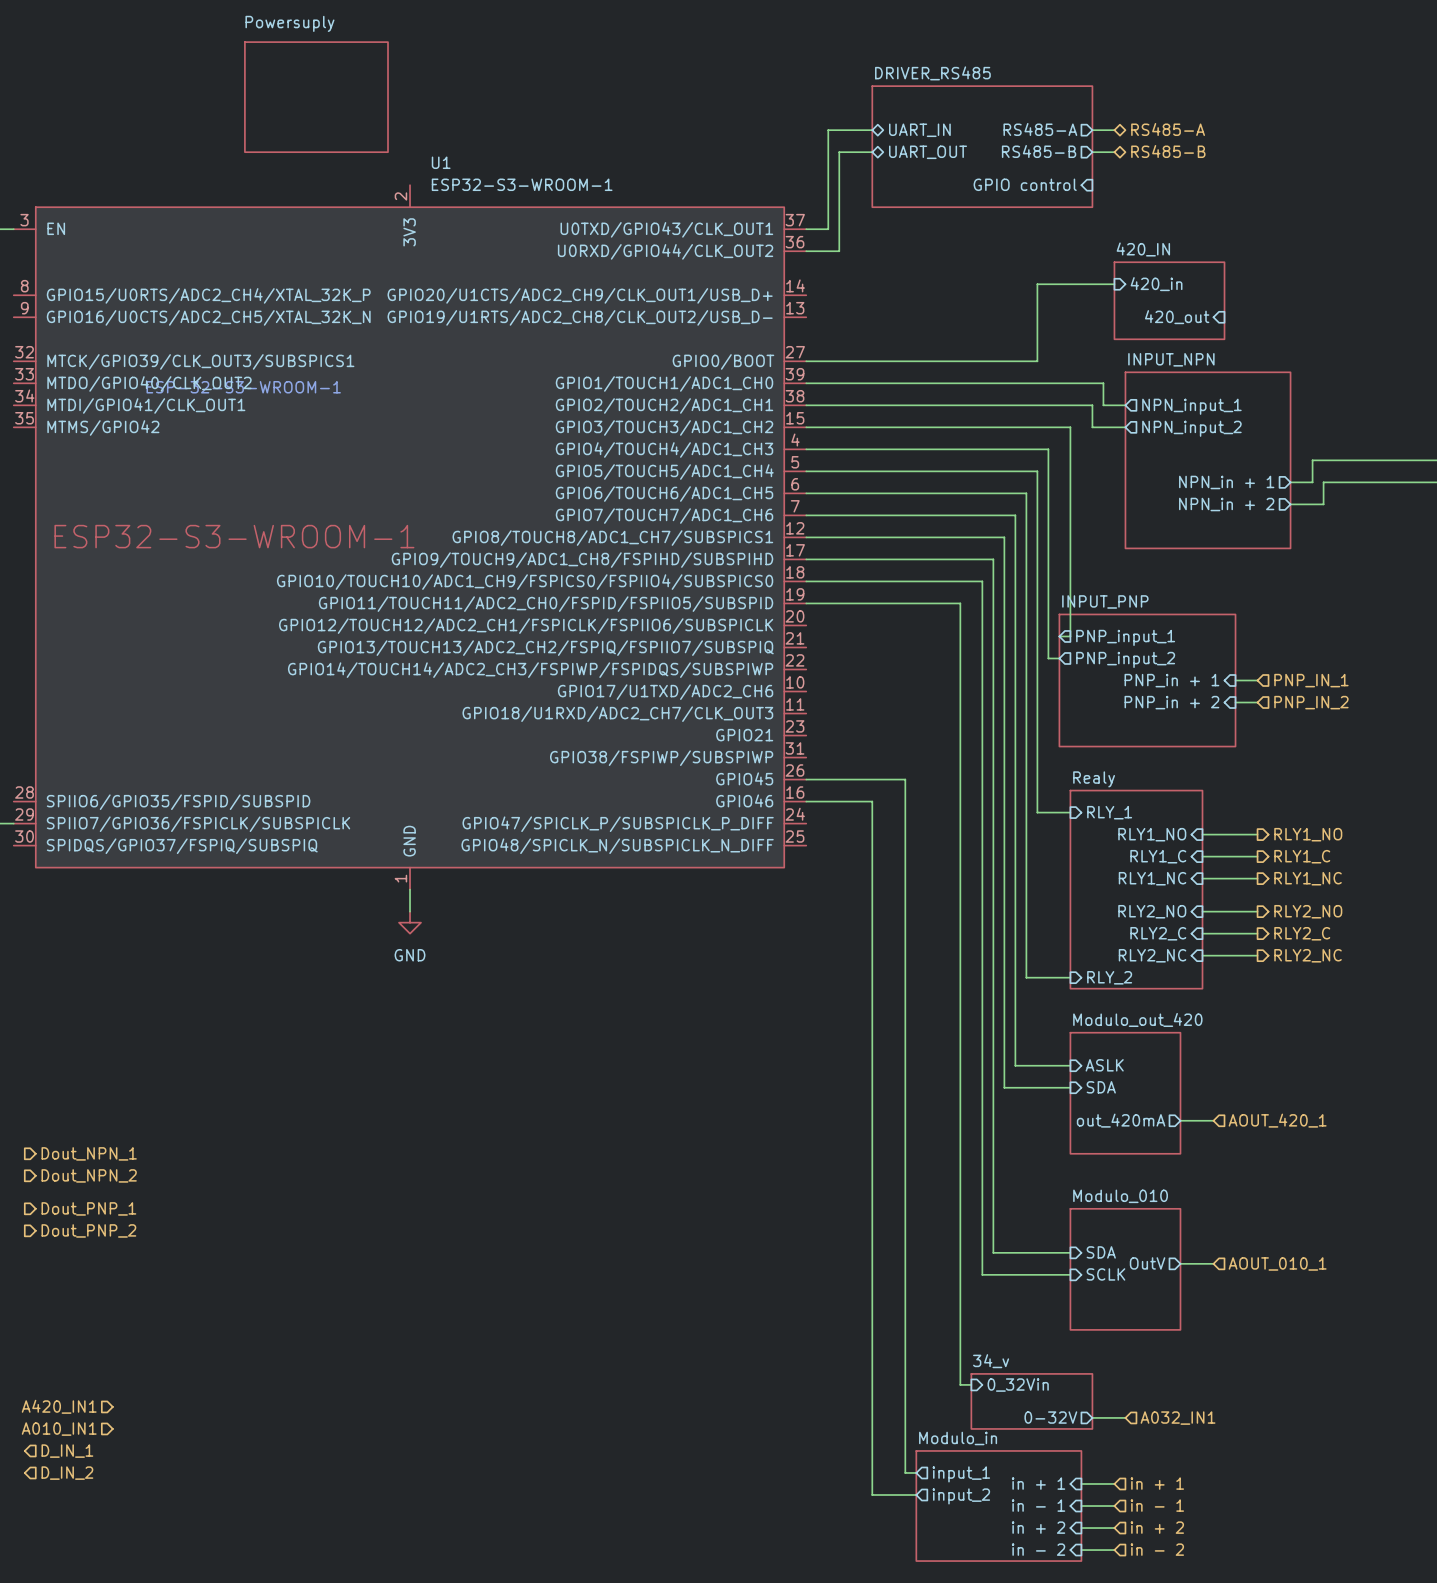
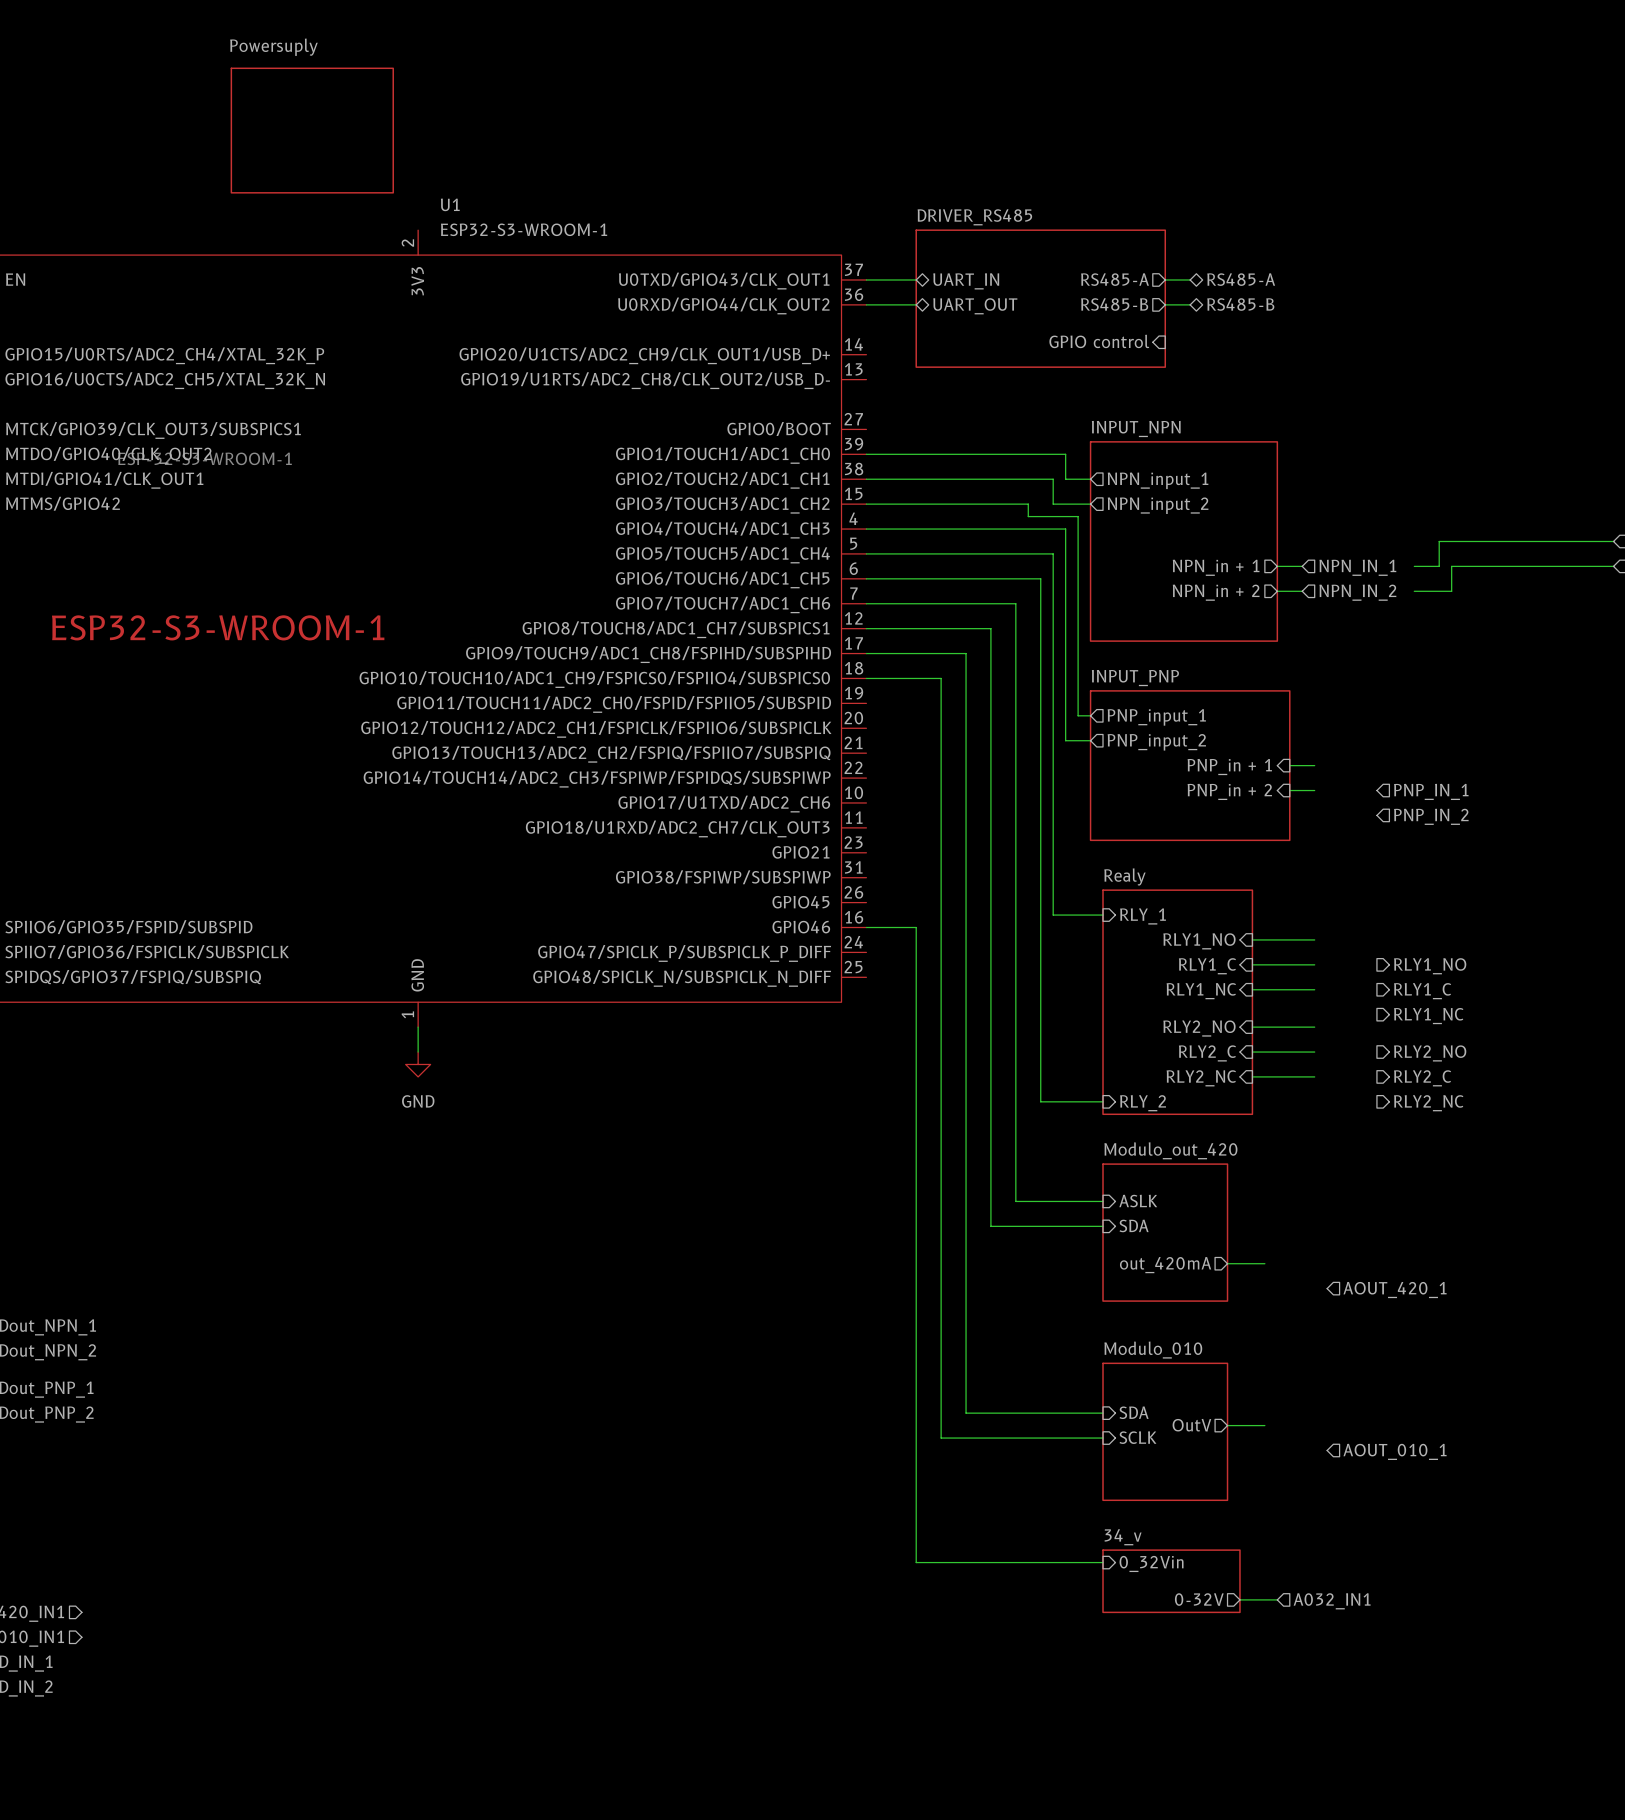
sheet pin position: RS485-A (1040, 129) -> RS485-A (1115, 279)
hierarchical label position: RS485-A (1168, 129) -> RS485-A (1241, 279)
wire: (872, 130) (828, 130) (828, 229) -> (916, 279) (891, 279)
sheet pin position: UART_IN (919, 130) -> UART_IN (966, 281)
wire: (1092, 130) (1114, 130) -> (1165, 279) (1190, 279)
sheet DRIVER_RS485 position: (982, 146) -> (1040, 298)
sheet pin position: RS485-B (1039, 151) -> RS485-B (1114, 304)
hierarchical label position: RS485-B (1168, 151) -> RS485-B (1240, 304)
wire: (872, 152) (839, 152) (839, 251) -> (916, 304) (903, 304)
sheet pin position: UART_OUT (928, 152) -> UART_OUT (975, 306)
wire: (1092, 152) (1114, 152) -> (1165, 304) (1190, 304)
sheet pin position: GPIO control (1025, 184) -> GPIO control (1099, 341)
wire: (1114, 284) (1037, 284) (1037, 361) (806, 361) -> none
sheet pin: 420_in (1156, 284) -> none
sheet 420_IN: (1169, 300) -> none
sheet pin: 420_out (1177, 317) -> none
wire: (982, 383) (1103, 383) (1103, 405) (1125, 405) -> none
wire: (971, 405) (982, 405) -> (1065, 454) (1065, 479)
wire: (1004, 405) (1092, 405) (1092, 427) (1125, 427) -> none
sheet pin position: NPN_input_1 (1191, 406) -> NPN_input_1 (1158, 480)
wire: (949, 427) (971, 427) -> (1053, 479) (1053, 504)
wire: (1004, 427) (1070, 427) (1070, 636) (1059, 636) -> none
sheet pin position: NPN_input_2 (1191, 428) -> NPN_input_2 (1158, 505)
wire: (982, 449) (1048, 449) (1048, 658) (1059, 658) -> (1065, 529) (1065, 678)
sheet INPUT_NPN position: (1208, 460) -> (1183, 541)
wire: (971, 471) (1037, 471) (1037, 812) (1070, 812) -> (1053, 553) (1053, 915) (1103, 915)
wire: none -> (1277, 566) (1302, 566)
sheet pin position: NPN_in + 1 (1226, 482) -> NPN_in + 1 (1216, 567)
hierarchical label: none -> NPN_IN_1 (1357, 567)
wire: (960, 493) (1026, 493) (1026, 977) (1070, 977) -> none
wire: none -> (1277, 591) (1302, 591)
sheet pin position: NPN_in + 2 (1226, 504) -> NPN_in + 2 (1216, 592)
hierarchical label: none -> NPN_IN_2 (1357, 592)
wire: (938, 515) (1015, 515) (1015, 1065) (1070, 1065) -> (1015, 603) (1015, 1201) (1103, 1201)
wire: (916, 537) (1004, 537) (1004, 1087) (1070, 1087) -> (990, 628) (990, 1226) (1103, 1226)
wire: (894, 559) (993, 559) -> (1028, 504) (1028, 516) (1078, 516) (1078, 653)
wire: none -> (966, 653) (966, 1413) (1103, 1413)
wire: (872, 581) (982, 581) -> none
wire: (806, 603) (960, 603) -> (1040, 578) (1040, 703)
wire: (993, 614) (993, 1252) -> (1078, 715) (1090, 715)
wire: (982, 636) (982, 1274) (1070, 1274) -> (1065, 740) (1090, 740)
sheet pin position: PNP_input_1 (1125, 637) -> PNP_input_1 (1156, 717)
sheet pin position: PNP_input_2 (1125, 659) -> PNP_input_2 (1156, 742)
sheet INPUT_PNP position: (1147, 680) -> (1190, 765)
sheet pin position: PNP_in + 1 (1171, 680) -> PNP_in + 1 (1229, 767)
wire: (1235, 680) (1257, 680) -> (1289, 765) (1314, 765)
sheet pin position: PNP_in + 2 (1171, 702) -> PNP_in + 2 (1229, 791)
wire: (1235, 702) (1257, 702) -> (1289, 790) (1314, 790)
wire: (806, 779) (905, 779) (905, 1472) (916, 1472) -> none
wire: (850, 801) (872, 801) -> (941, 678) (941, 927)
wire: none -> (916, 927) (916, 1562) (1103, 1562)
sheet pin position: RLY_1 (1109, 812) -> RLY_1 (1143, 916)
sheet pin position: RLY1_NO (1152, 834) -> RLY1_NO (1199, 941)
wire: (1202, 834) (1257, 834) -> (1314, 964) (1252, 964)
sheet pin position: RLY1_C (1158, 856) -> RLY1_C (1207, 966)
wire: (1202, 856) (1257, 856) -> (1314, 989) (1252, 989)
sheet pin position: RLY1_NC (1152, 878) -> RLY1_NC (1201, 991)
wire: (1202, 878) (1257, 878) -> (1252, 939) (1314, 939)
sheet Realy position: (1136, 889) -> (1177, 1002)
sheet pin position: RLY2_NO (1152, 911) -> RLY2_NO (1199, 1028)
wire: (1202, 911) (1257, 911) -> (1314, 1052) (1252, 1052)
sheet pin position: RLY2_C (1158, 933) -> RLY2_C (1207, 1053)
wire: (1202, 933) (1257, 933) -> (1314, 1076) (1252, 1076)
wire: (960, 955) (960, 1384) (971, 1384) -> (1040, 1101) (1103, 1101)
sheet pin position: RLY2_NC (1152, 955) -> RLY2_NC (1201, 1078)
wire: (1202, 955) (1257, 955) -> (1252, 1027) (1314, 1027)
sheet pin position: RLY_2 (1109, 977) -> RLY_2 (1143, 1103)
sheet pin position: ASLK (1104, 1065) -> ASLK (1138, 1201)
sheet pin position: SDA (1101, 1087) -> SDA (1134, 1225)
sheet Modulo_out_420 position: (1125, 1093) -> (1165, 1232)
sheet pin position: out_420mA (1121, 1120) -> out_420mA (1165, 1265)
wire: (1180, 1120) (1213, 1120) -> (1227, 1263) (1264, 1263)
wire: (872, 1252) (872, 1495) (916, 1495) -> (941, 1438) (1078, 1438)
wire: (1015, 1252) (1070, 1252) -> none
sheet pin position: SDA (1101, 1252) -> SDA (1134, 1412)
sheet pin position: OutV (1147, 1263) -> OutV (1191, 1425)
wire: (1180, 1263) (1213, 1263) -> (1227, 1425) (1264, 1425)
sheet Modulo_010 position: (1125, 1269) -> (1165, 1431)
sheet pin position: SCLK (1105, 1274) -> SCLK (1137, 1437)
sheet pin position: 0_32Vin (1018, 1385) -> 0_32Vin (1151, 1563)
sheet 34_v position: (1031, 1401) -> (1171, 1581)
sheet pin position: 0-32V (1050, 1417) -> 0-32V (1199, 1599)
wire: (1092, 1417) (1125, 1417) -> (1239, 1599) (1277, 1599)
hierarchical label position: A032_IN1 (1178, 1418) -> A032_IN1 (1332, 1601)
sheet pin: input_1 (961, 1474) -> none
sheet pin: in + 1 (1038, 1483) -> none
wire: (1081, 1483) (1114, 1483) -> none
hierarchical label: in + 1 (1157, 1483) -> none
sheet pin: input_2 (961, 1496) -> none
sheet pin: in - 1 (1038, 1505) -> none
hierarchical label: in - 1 (1157, 1505) -> none
sheet Modulo_in: (998, 1506) -> none
wire: (1081, 1506) (1114, 1506) -> none
sheet pin: in + 2 (1038, 1527) -> none
hierarchical label: in + 2 (1157, 1527) -> none
wire: (1081, 1528) (1114, 1528) -> none
sheet pin: in - 2 (1038, 1549) -> none
hierarchical label: in - 2 (1157, 1549) -> none
wire: (1081, 1550) (1114, 1550) -> none

